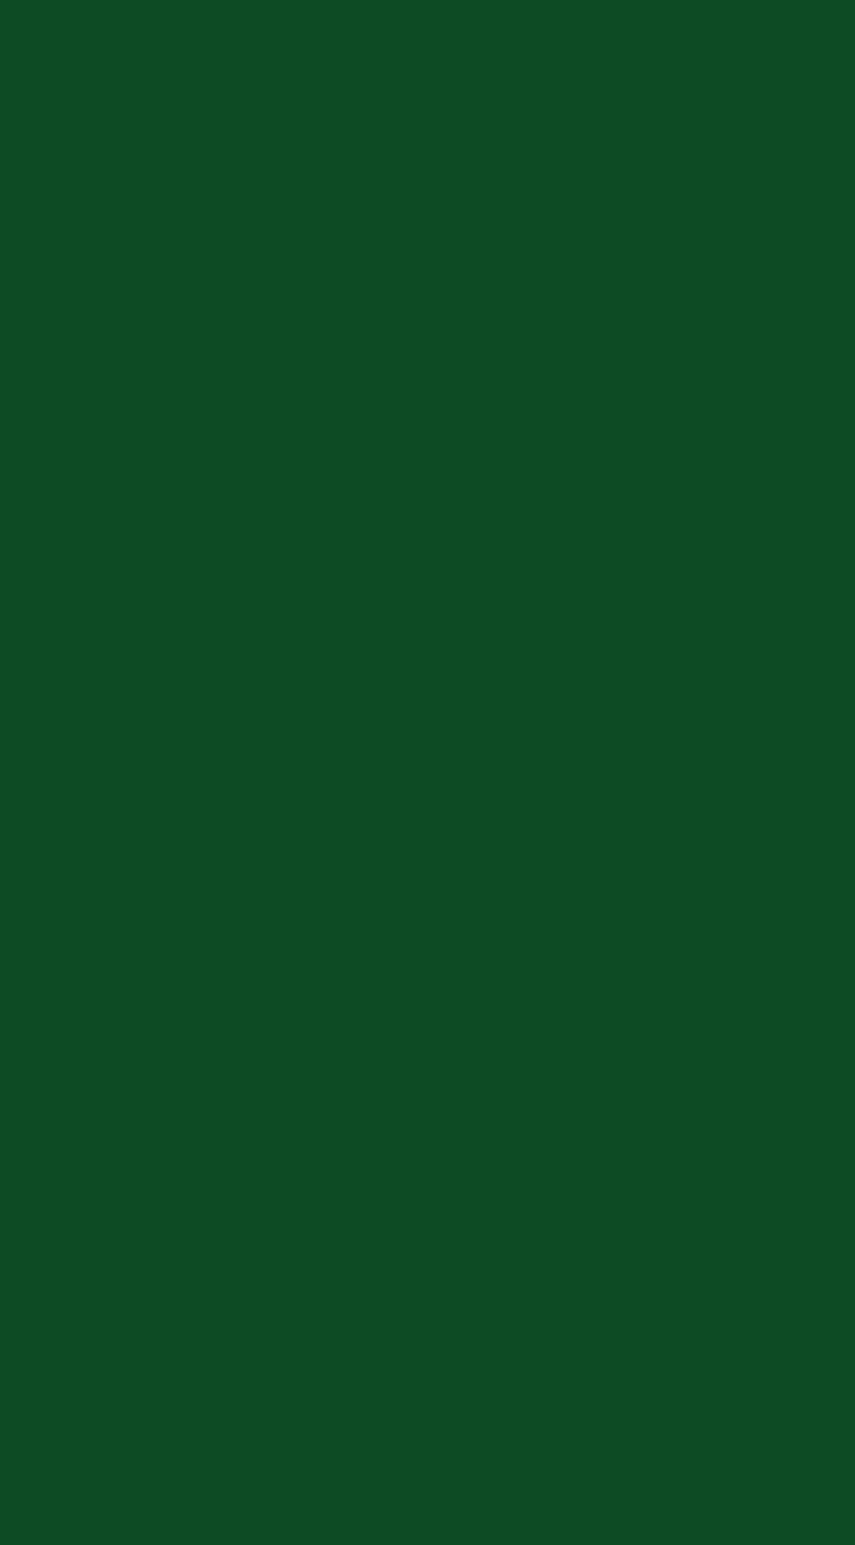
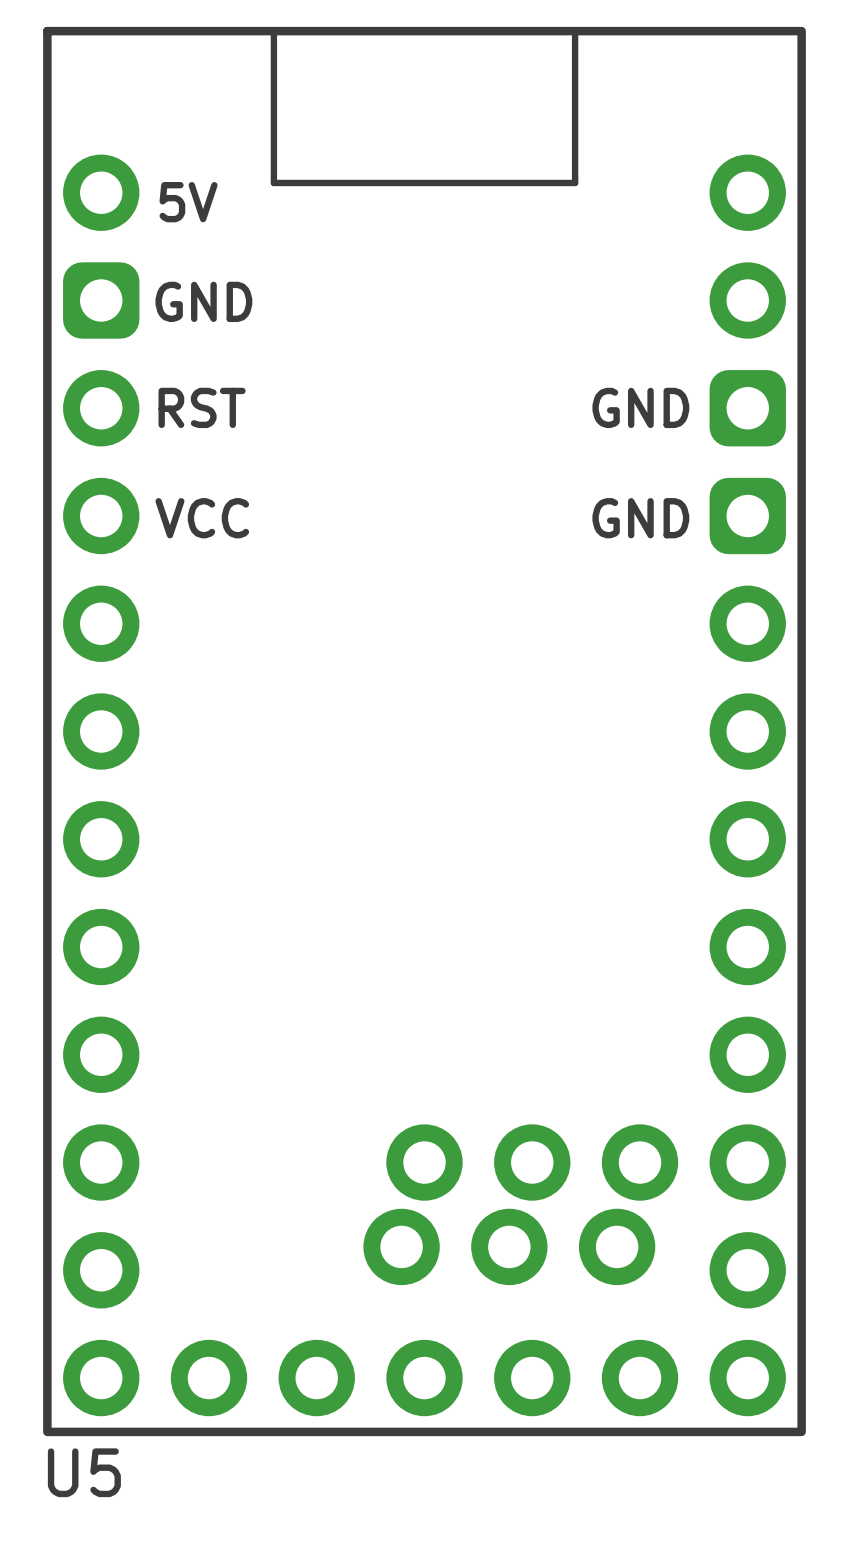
U5: none -> (424, 731)

